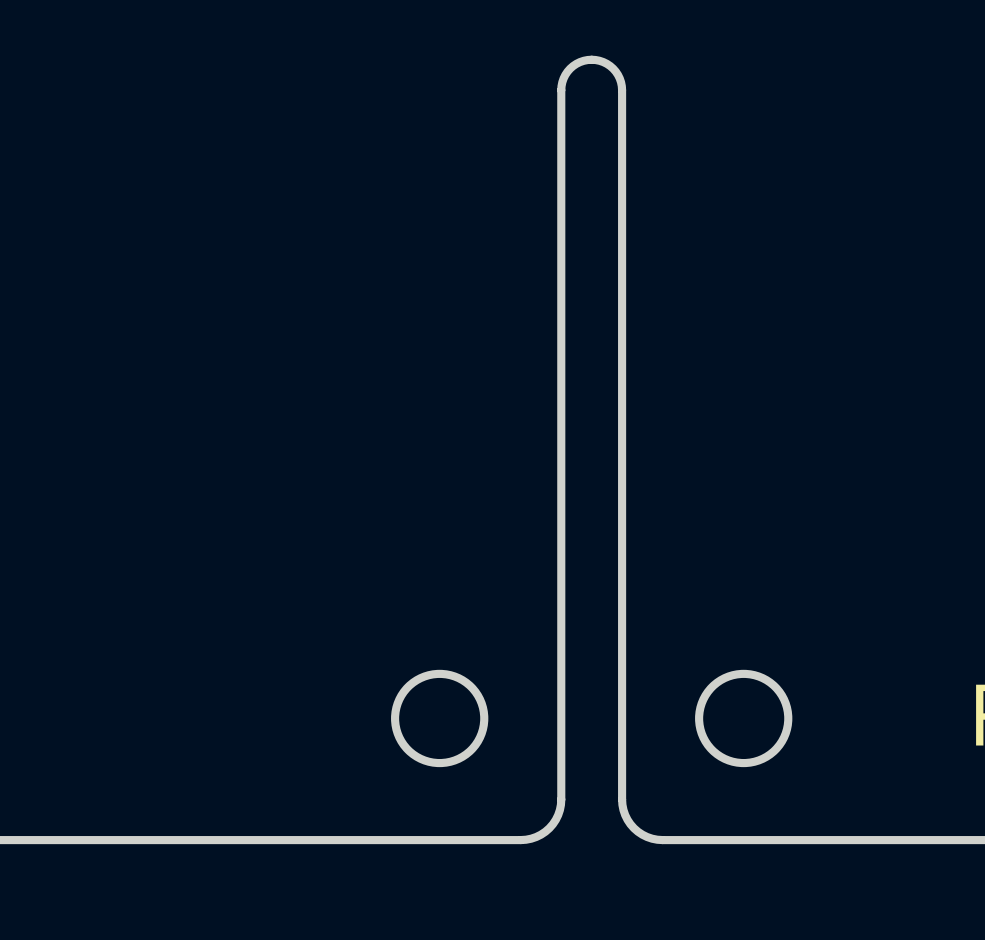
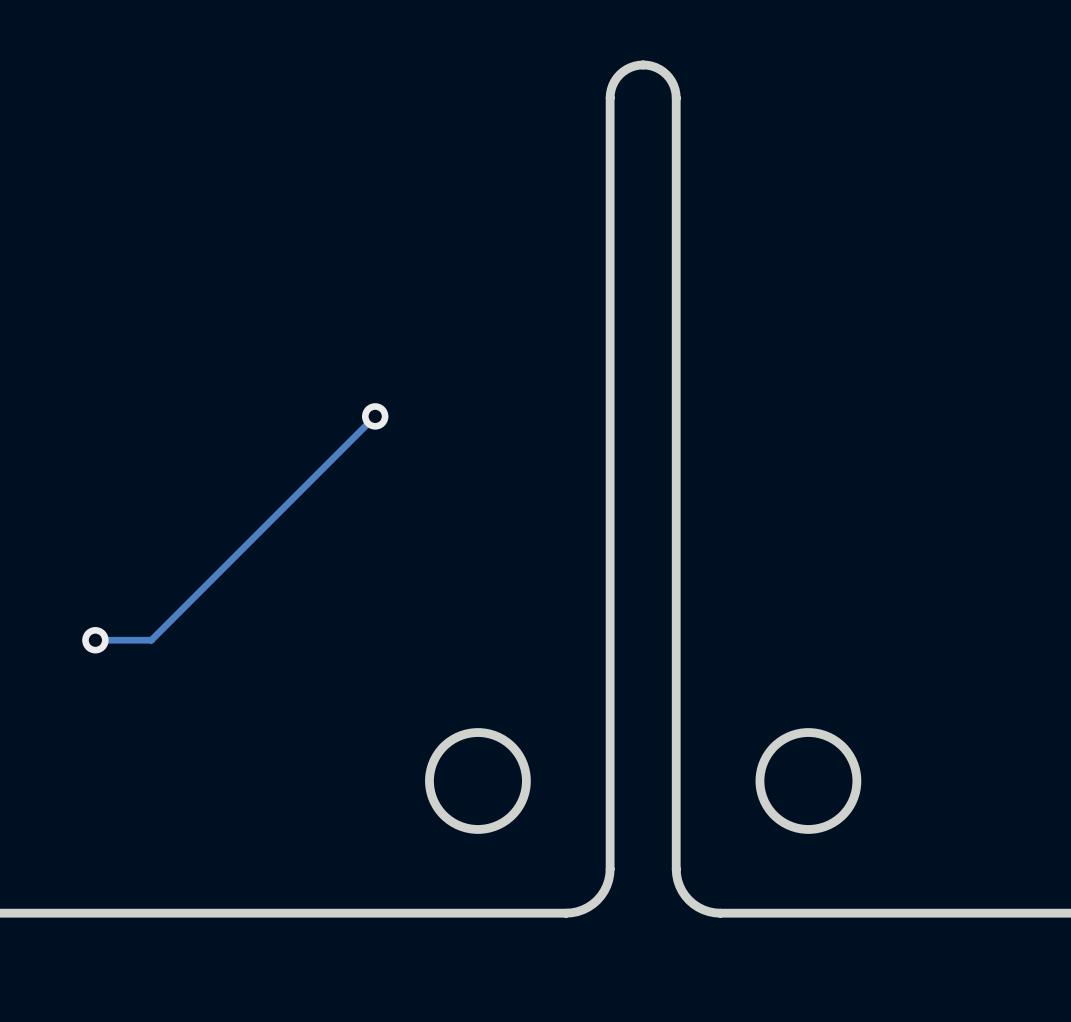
track: none -> (375, 416) (151, 640) (95, 640)
via: none -> (375, 416)
via: none -> (95, 640)

